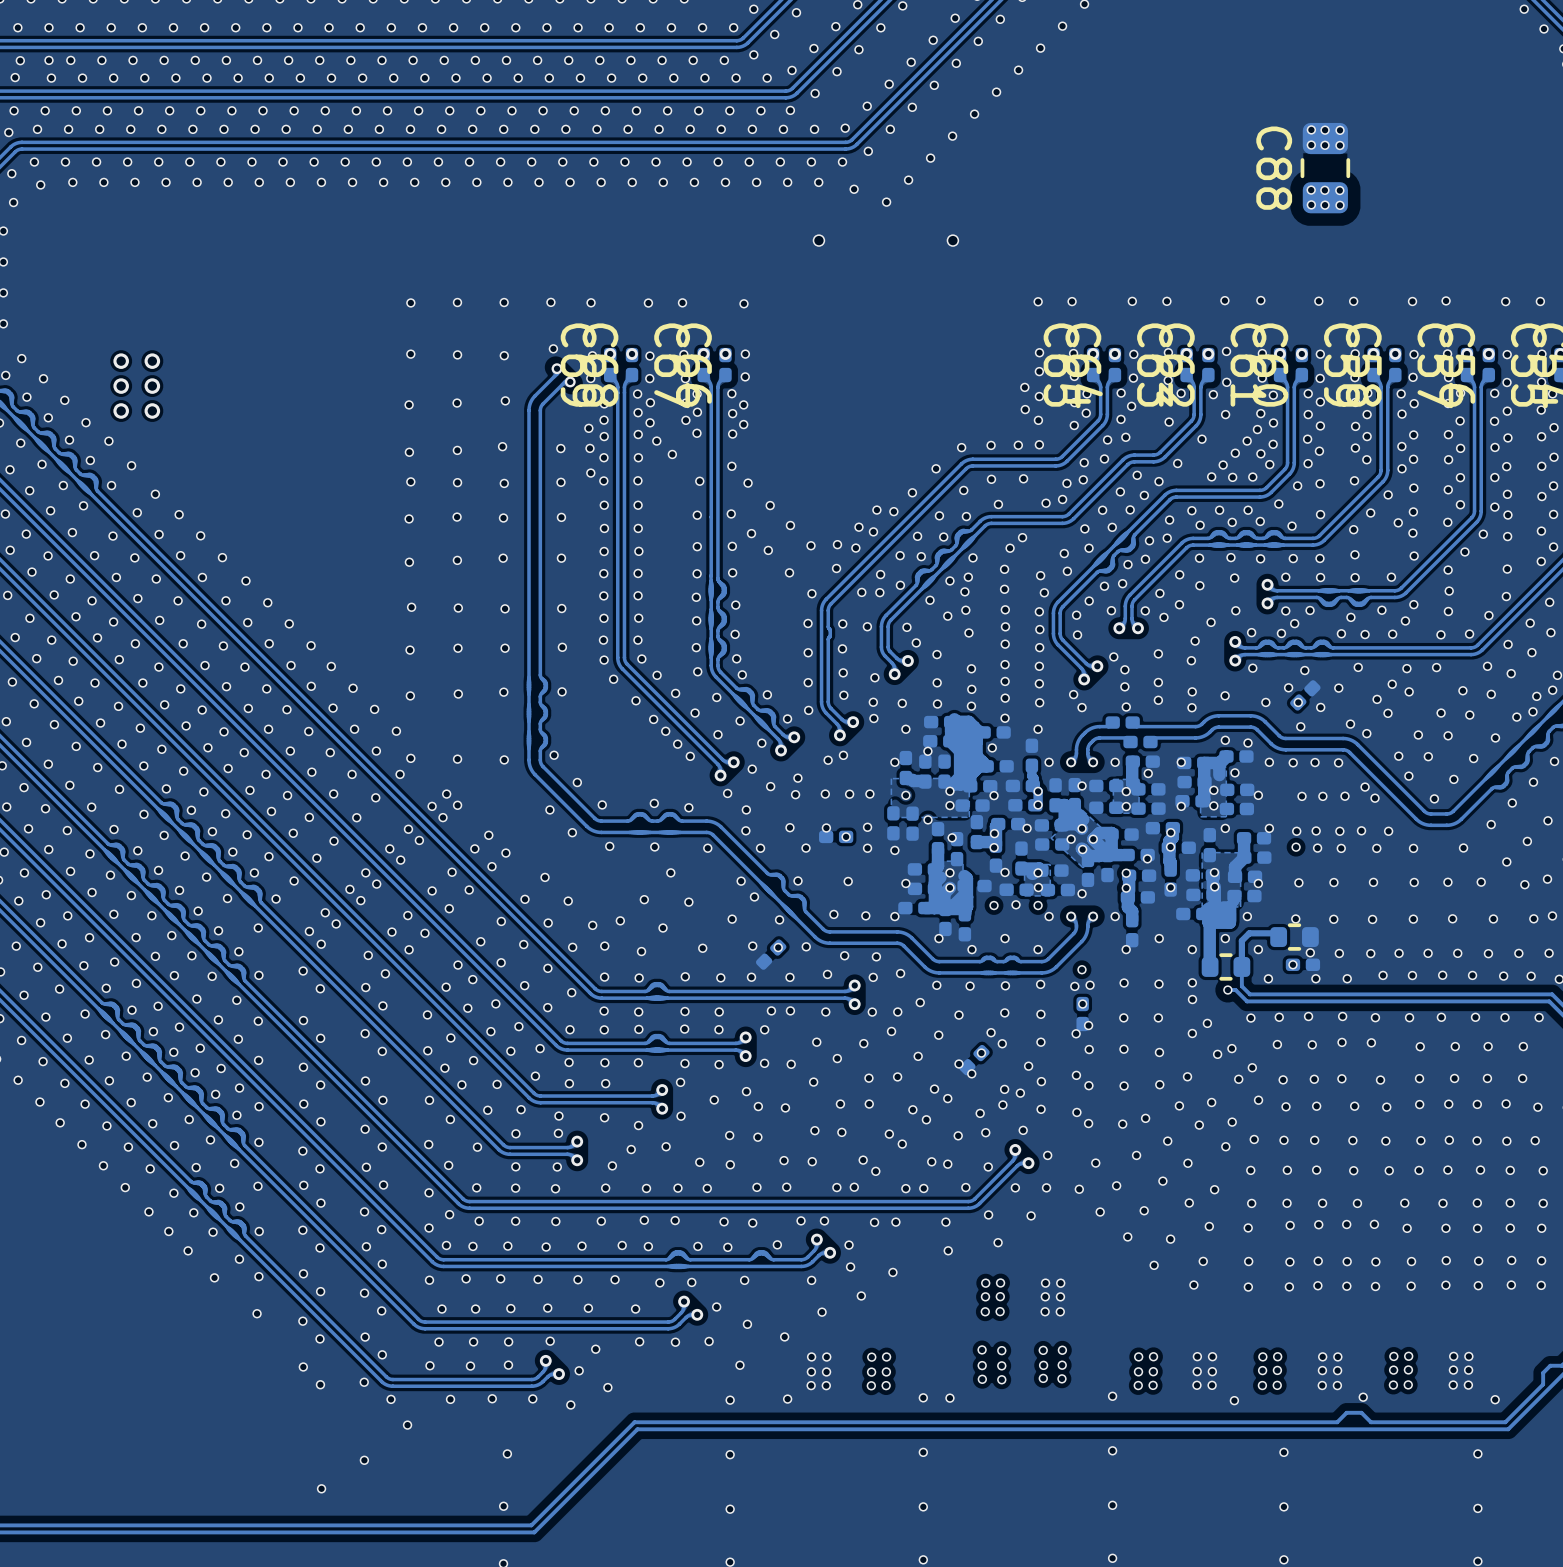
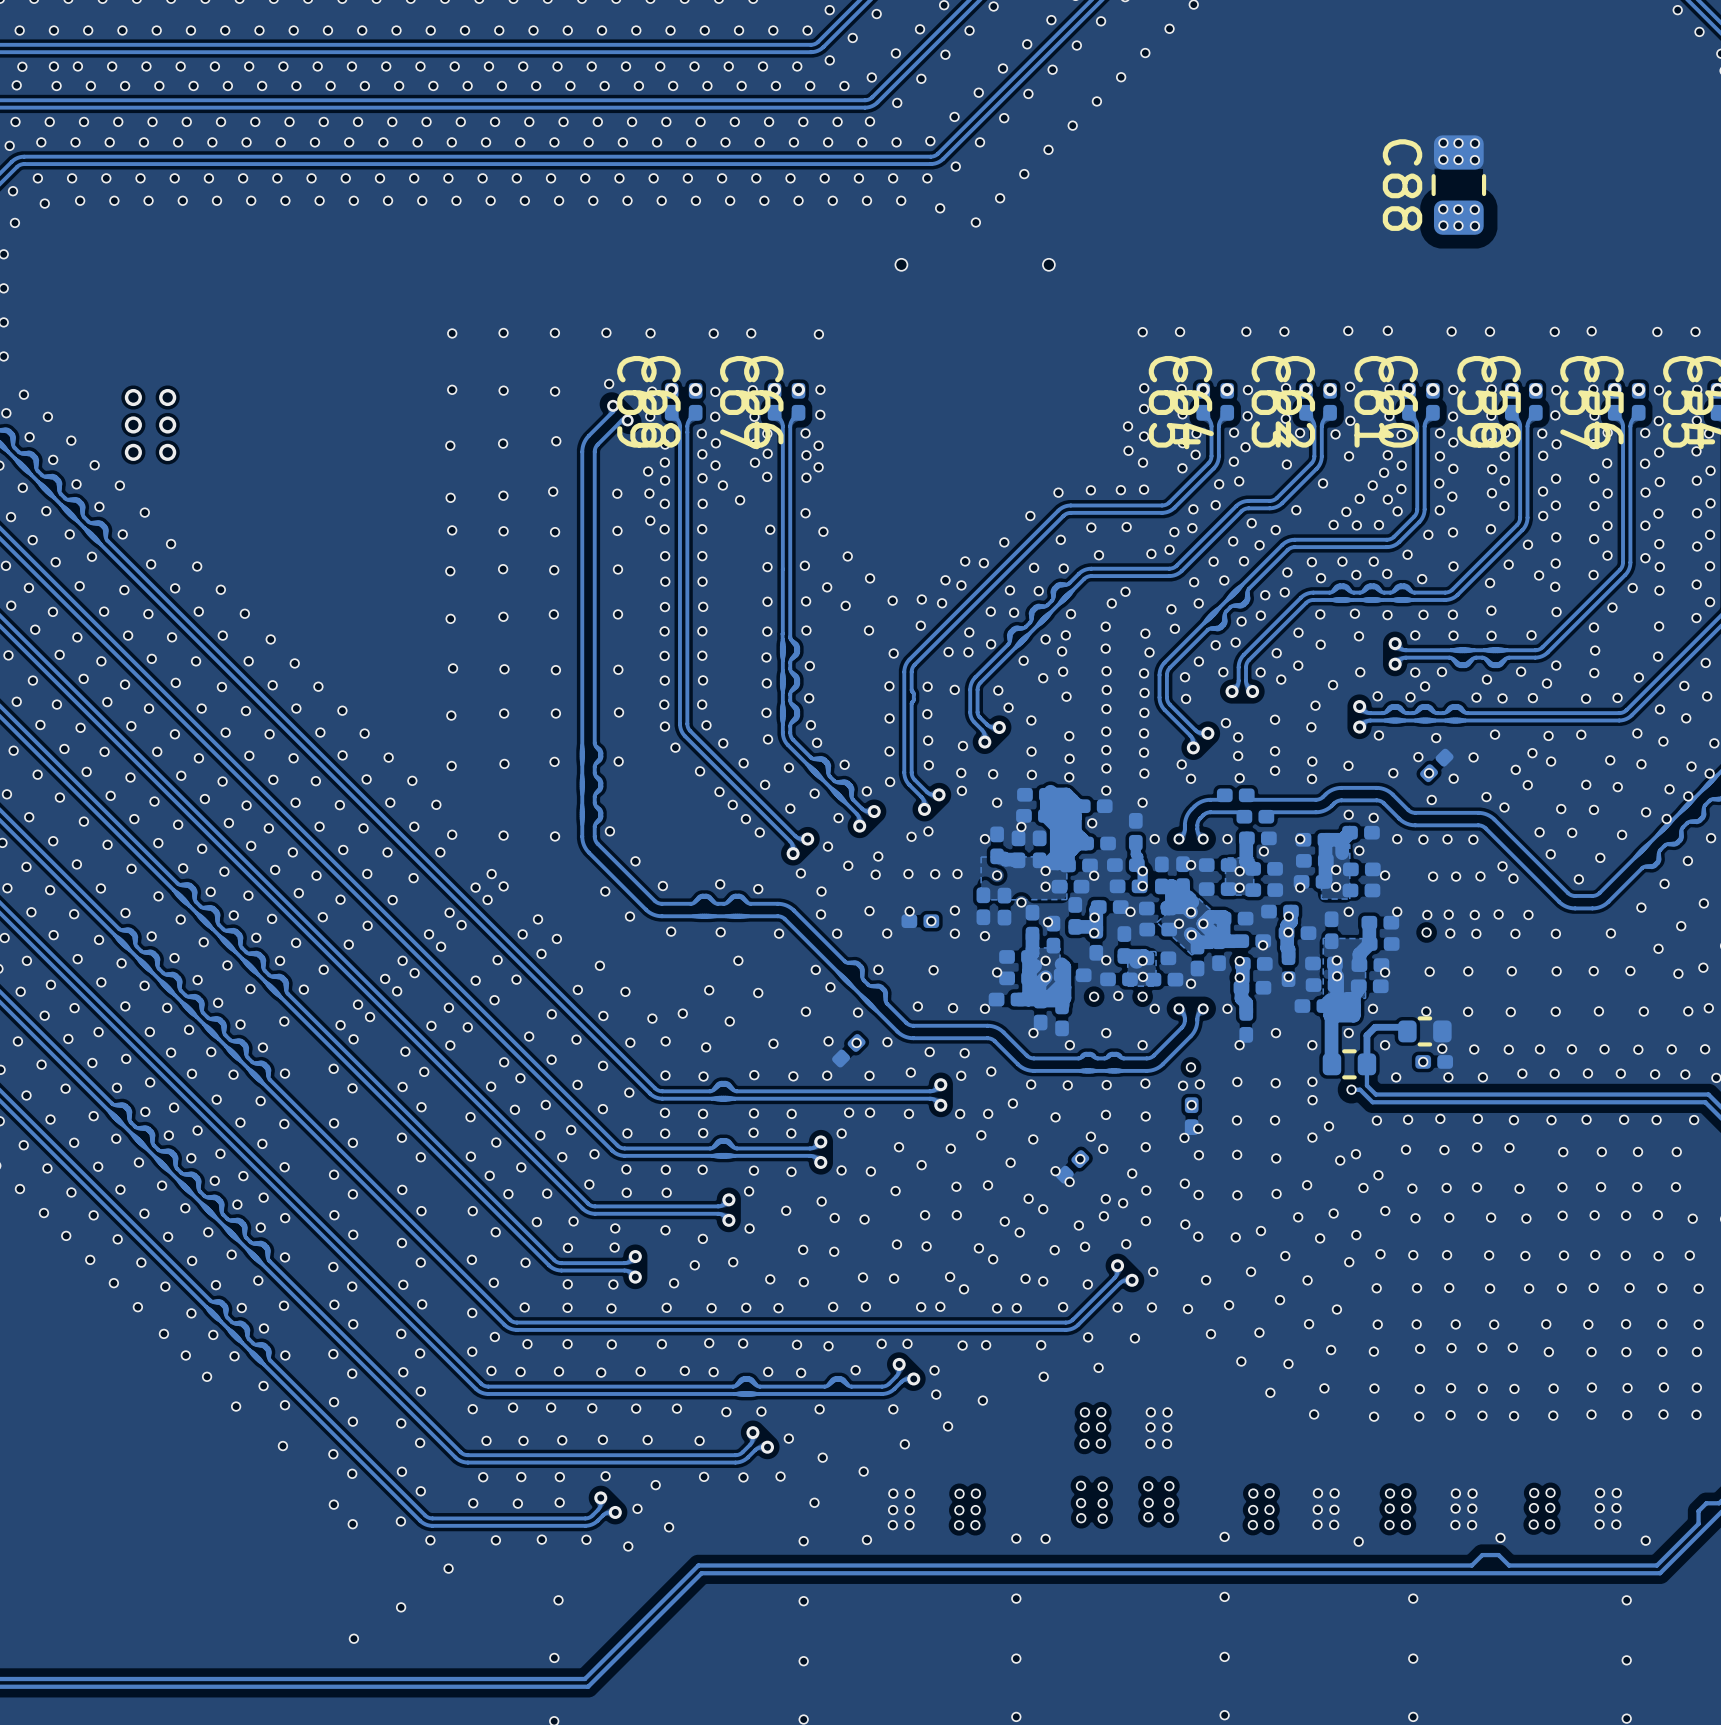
via: (1552, 690) -> none
via: none -> (1709, 773)
via: (1532, 711) -> none
via: none -> (1688, 796)
via: none -> (1666, 818)

